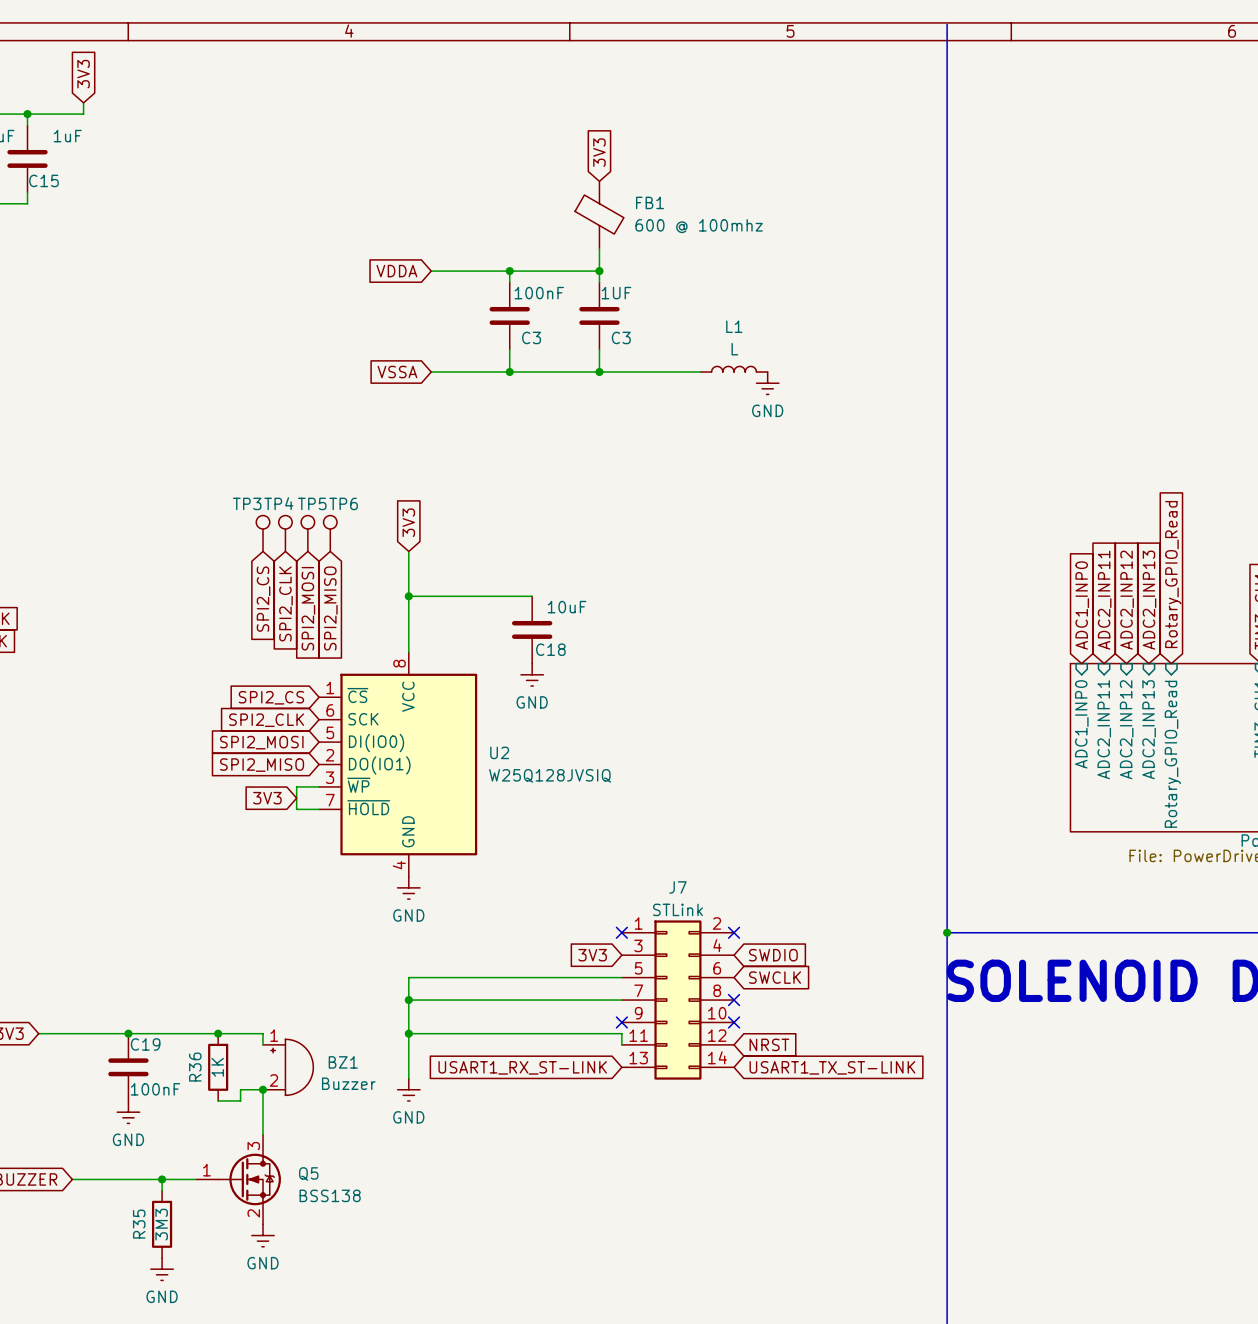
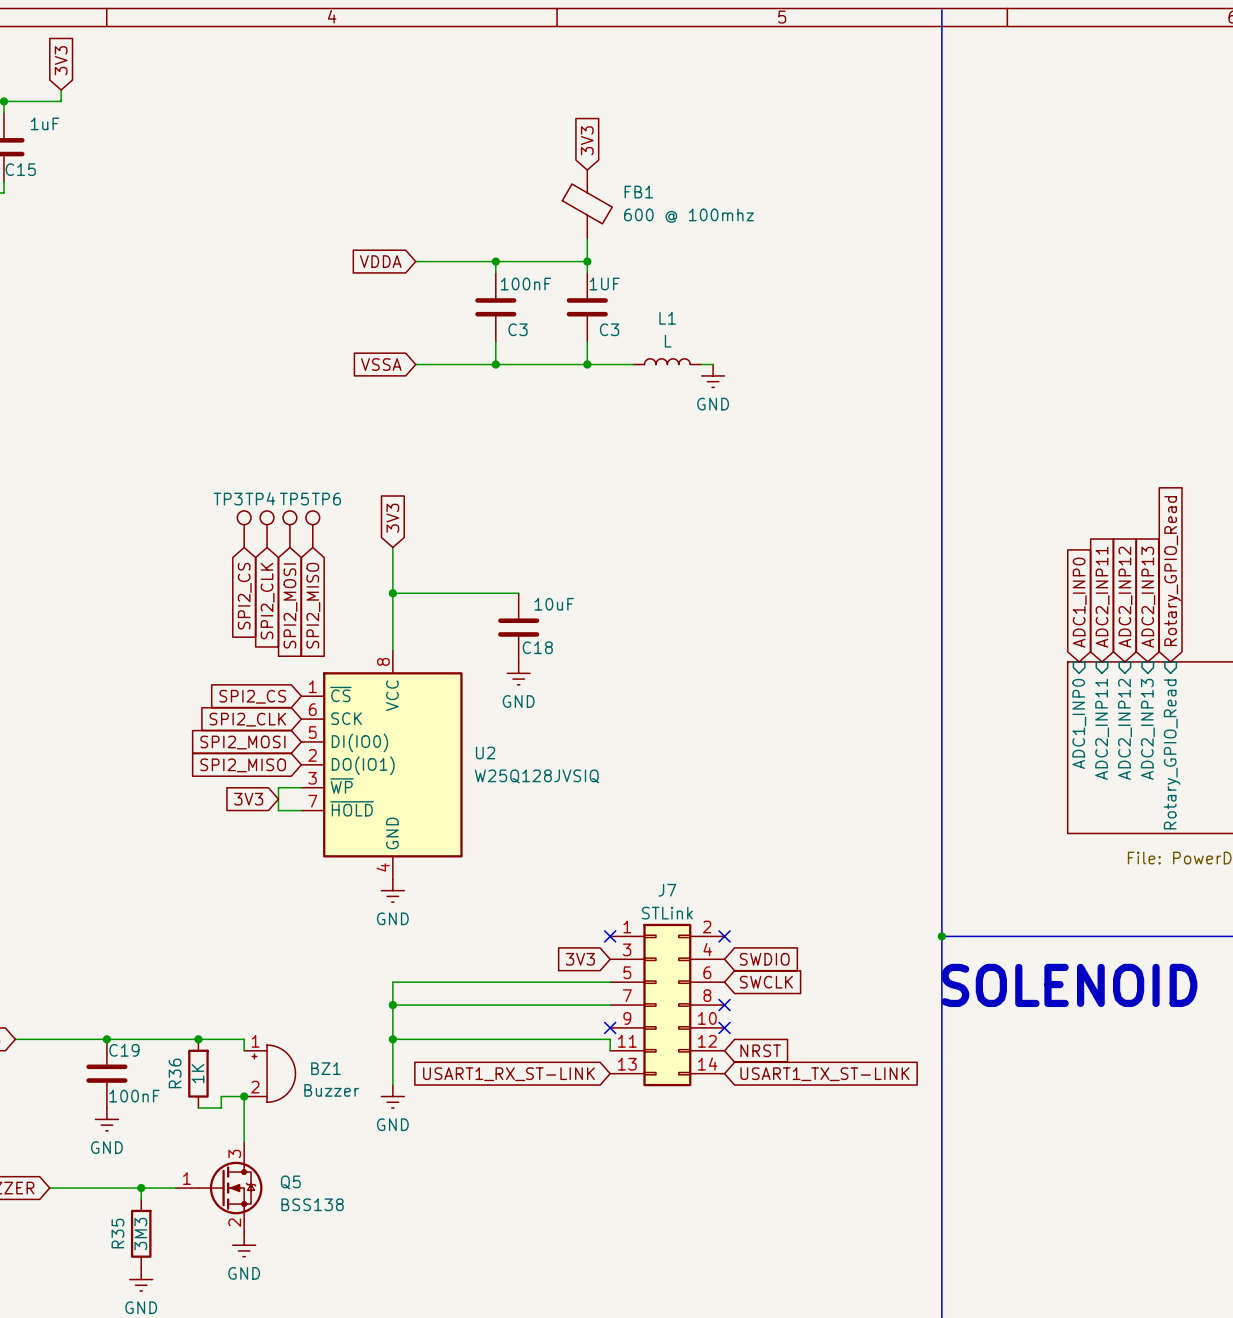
L1 position: (734, 369) -> (667, 361)
wire: (644, 372) (700, 372) -> none
wire: none -> (701, 364) (713, 364)
power symbol position: GND (767, 383) -> GND (713, 375)

